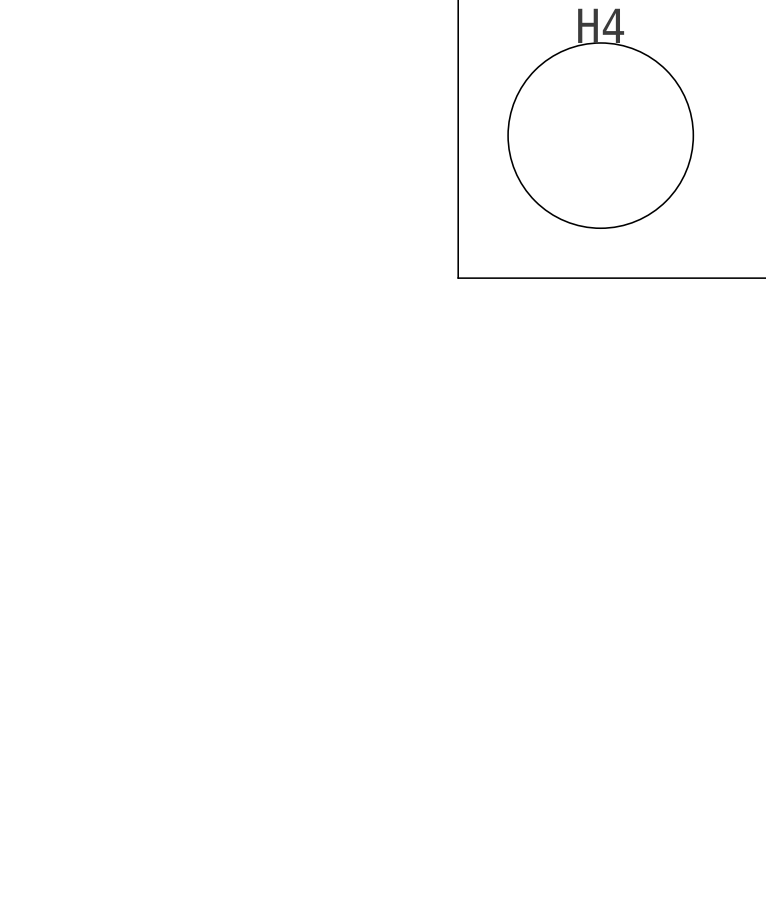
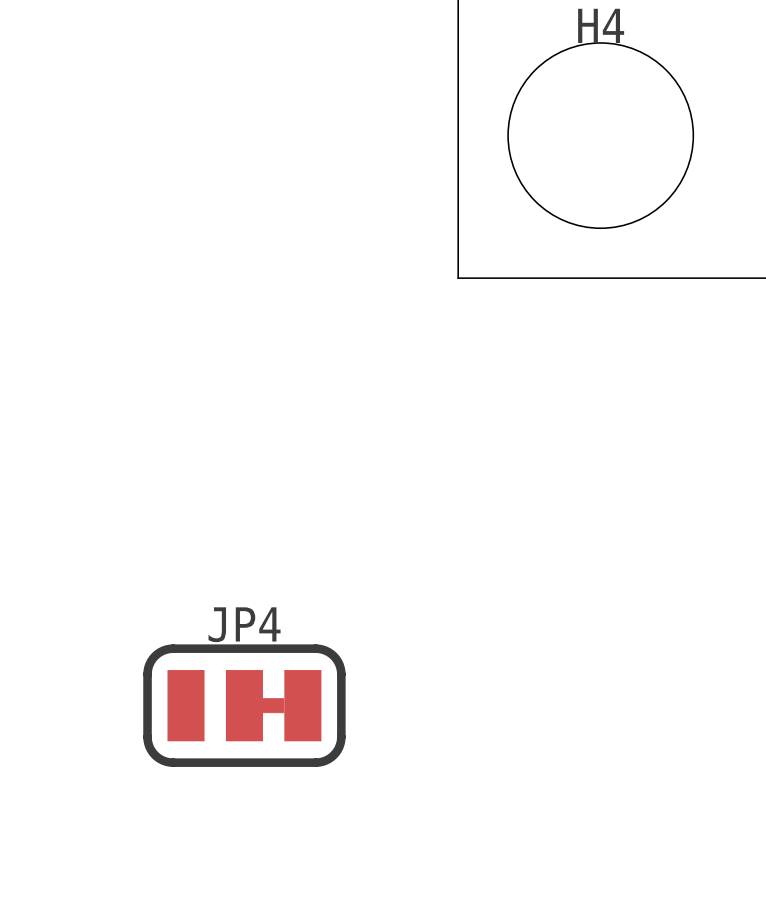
JP4: none -> (244, 705)

